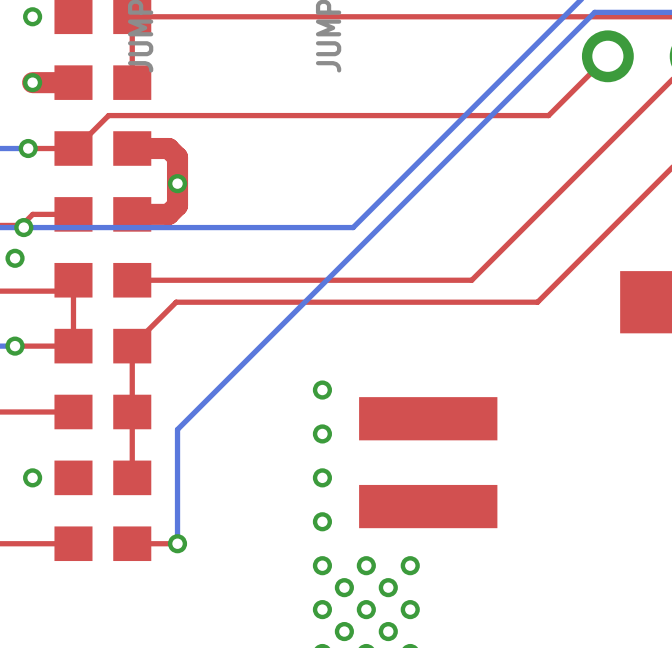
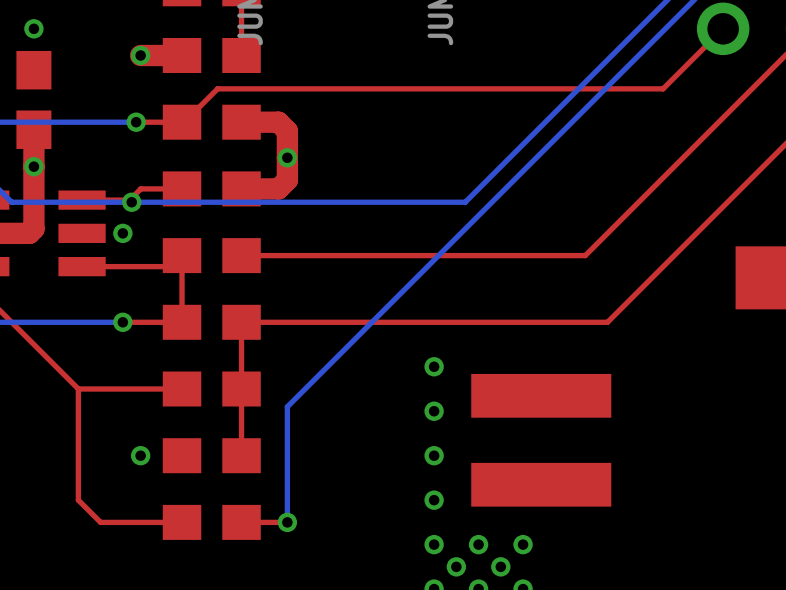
top track: (537, 302) (176, 302) (132, 346) -> (652, 277) (607, 322) (241, 322)

